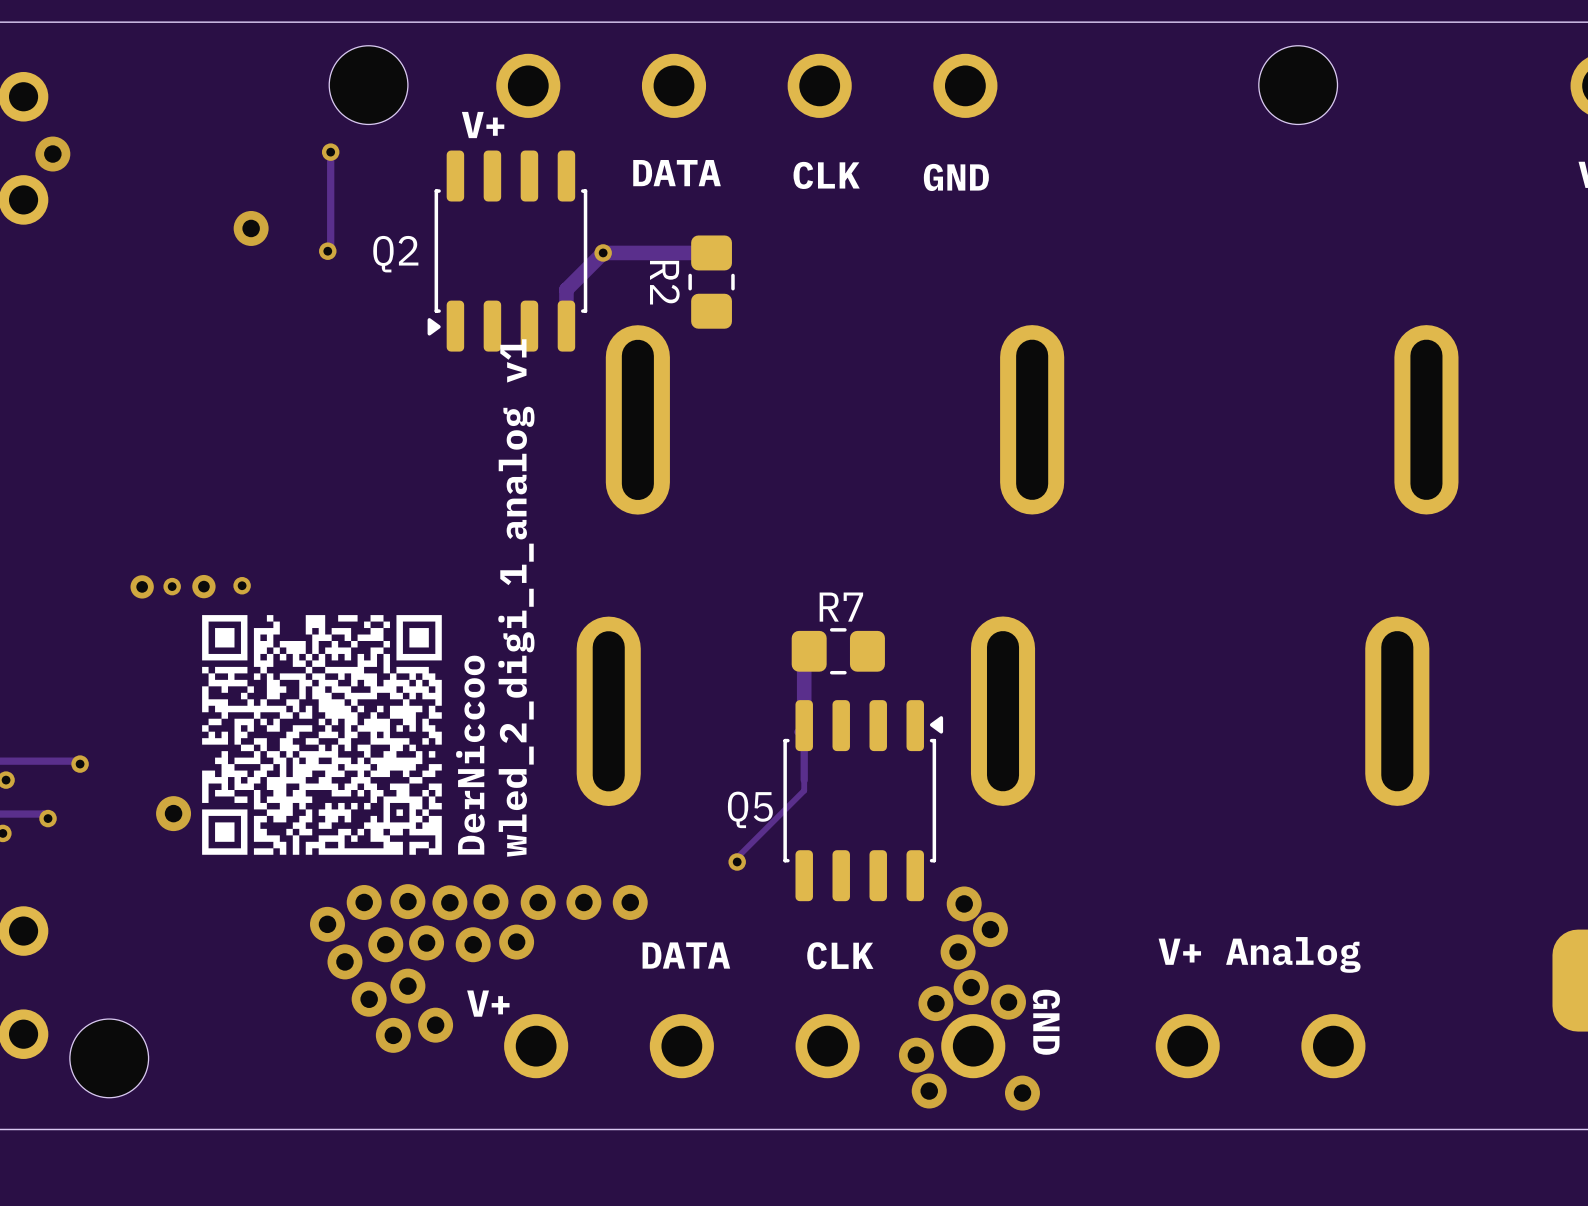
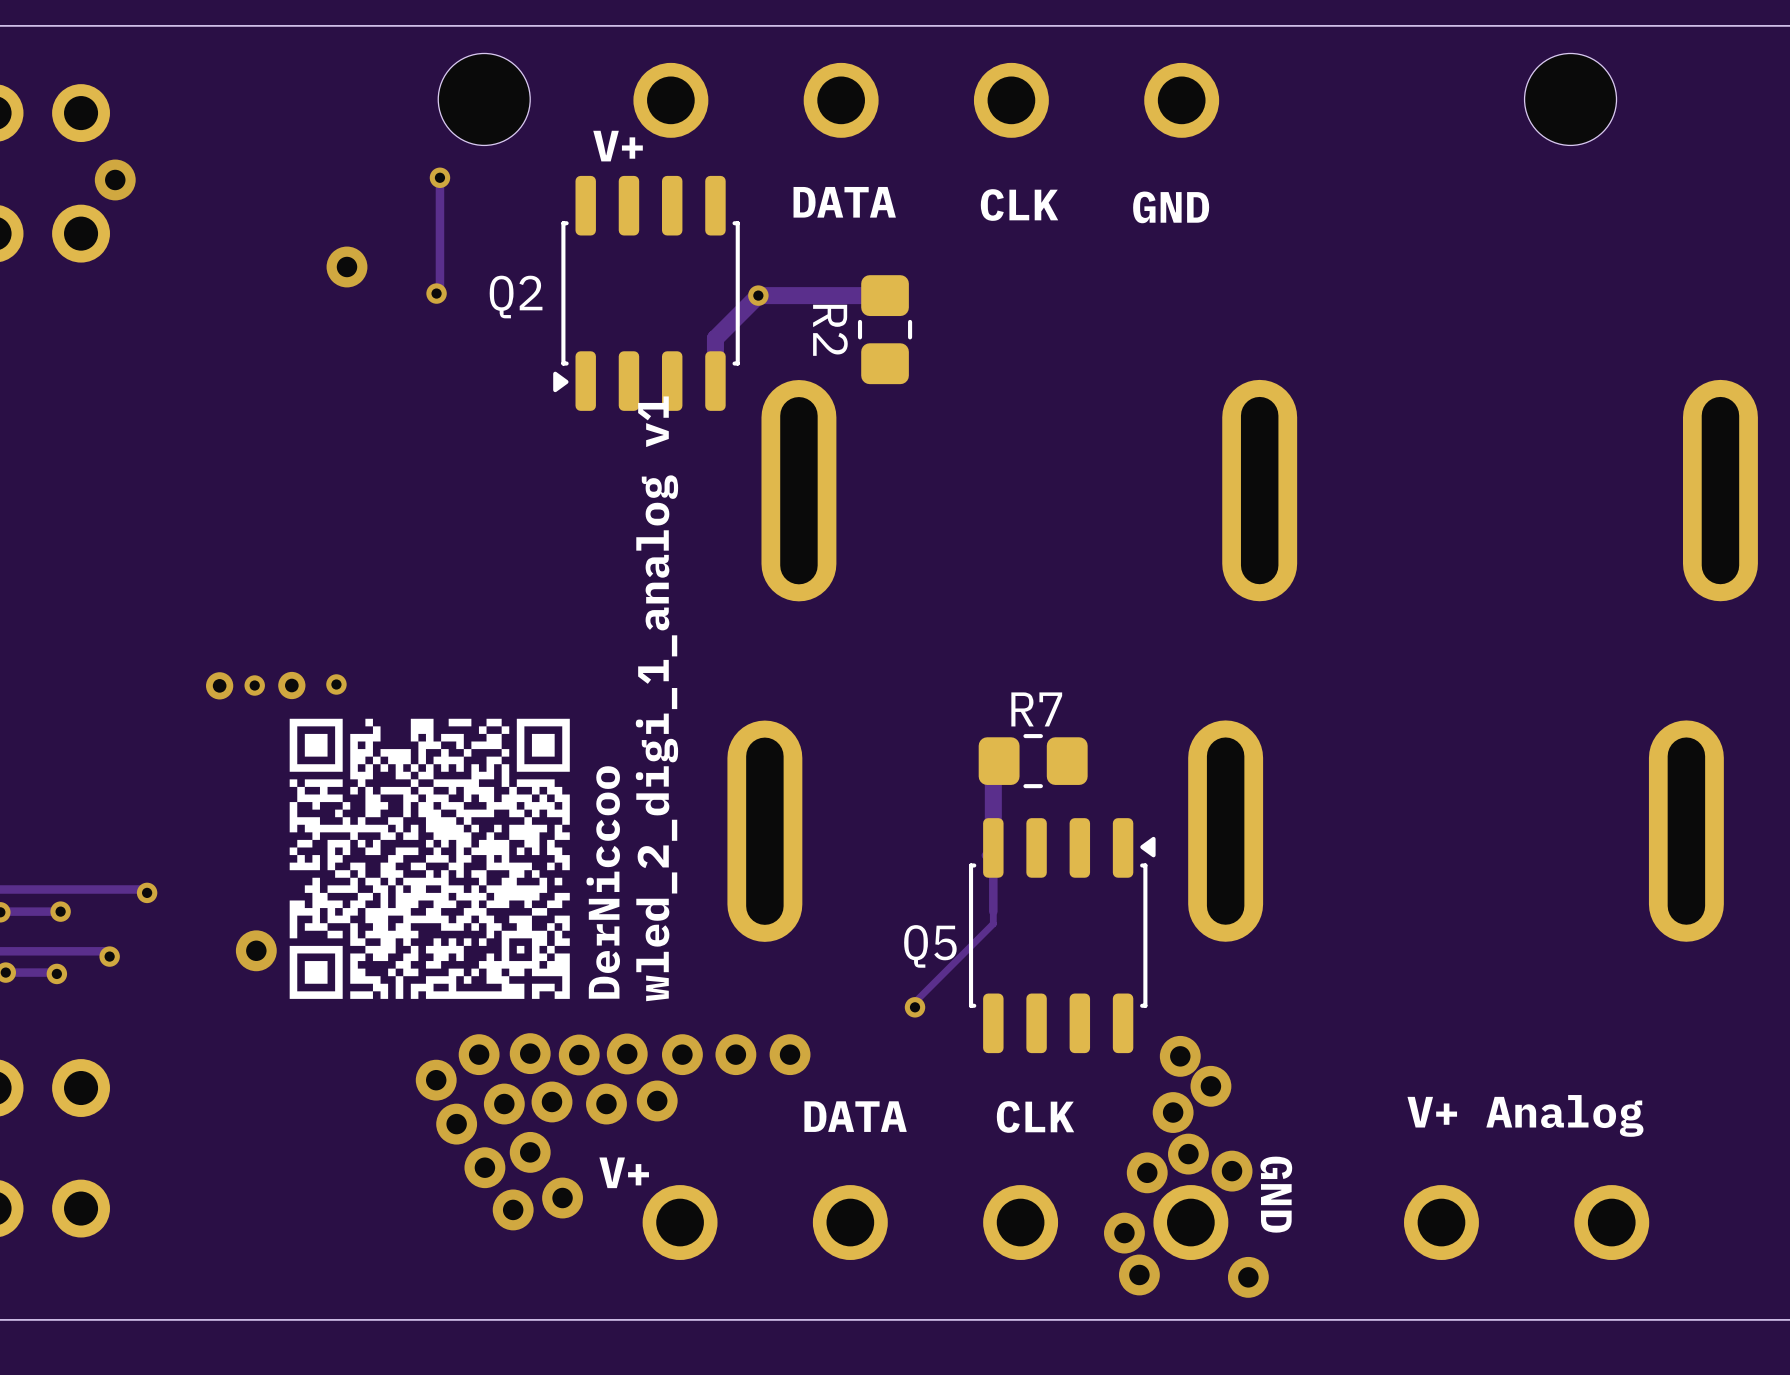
part: (109, 1058) -> none

